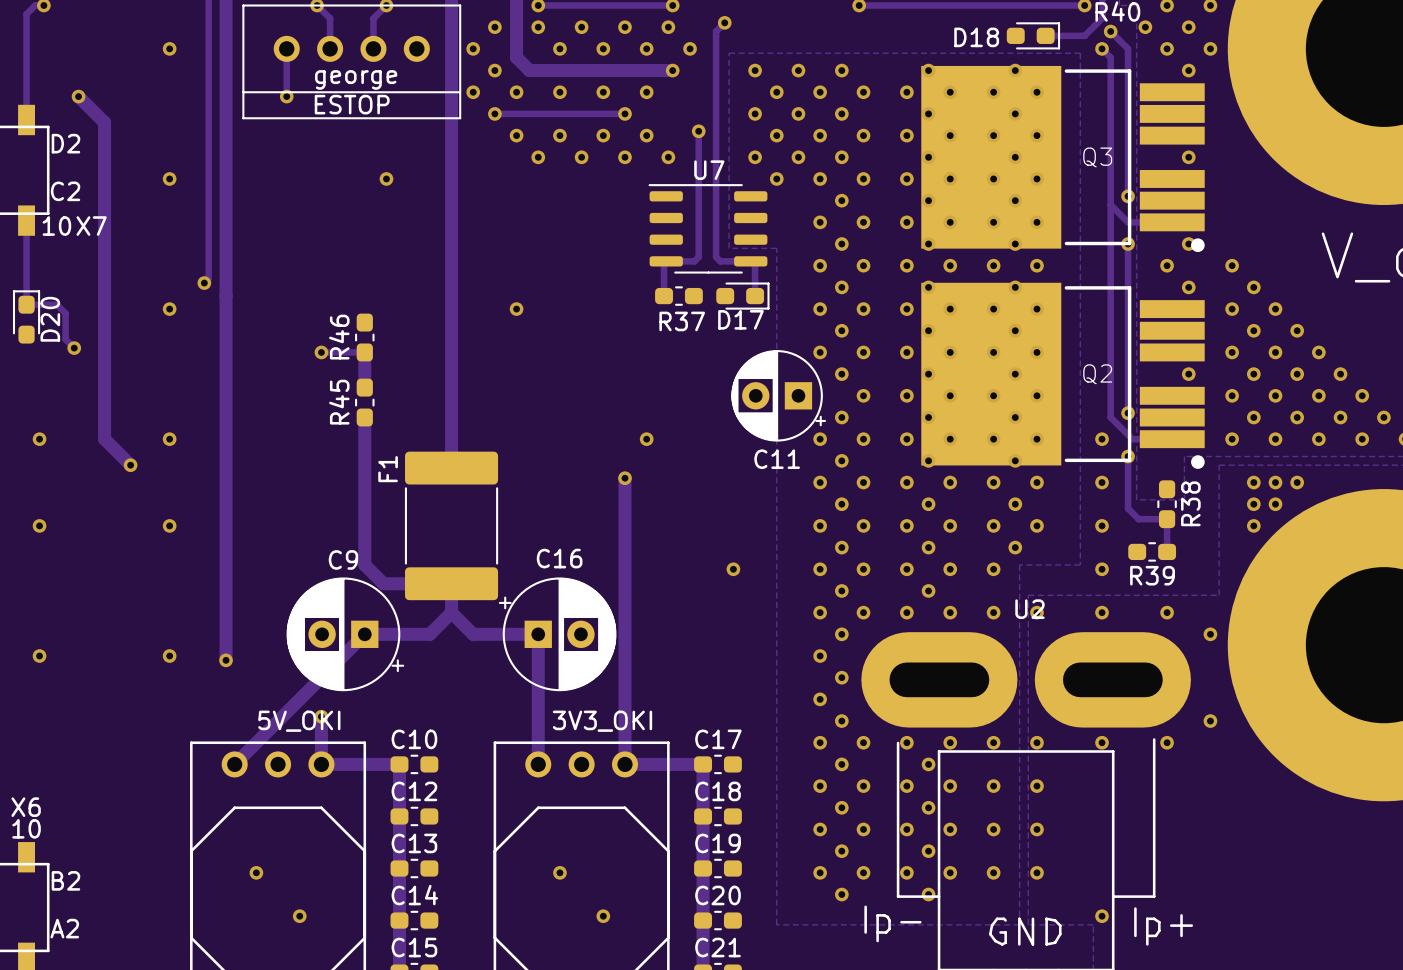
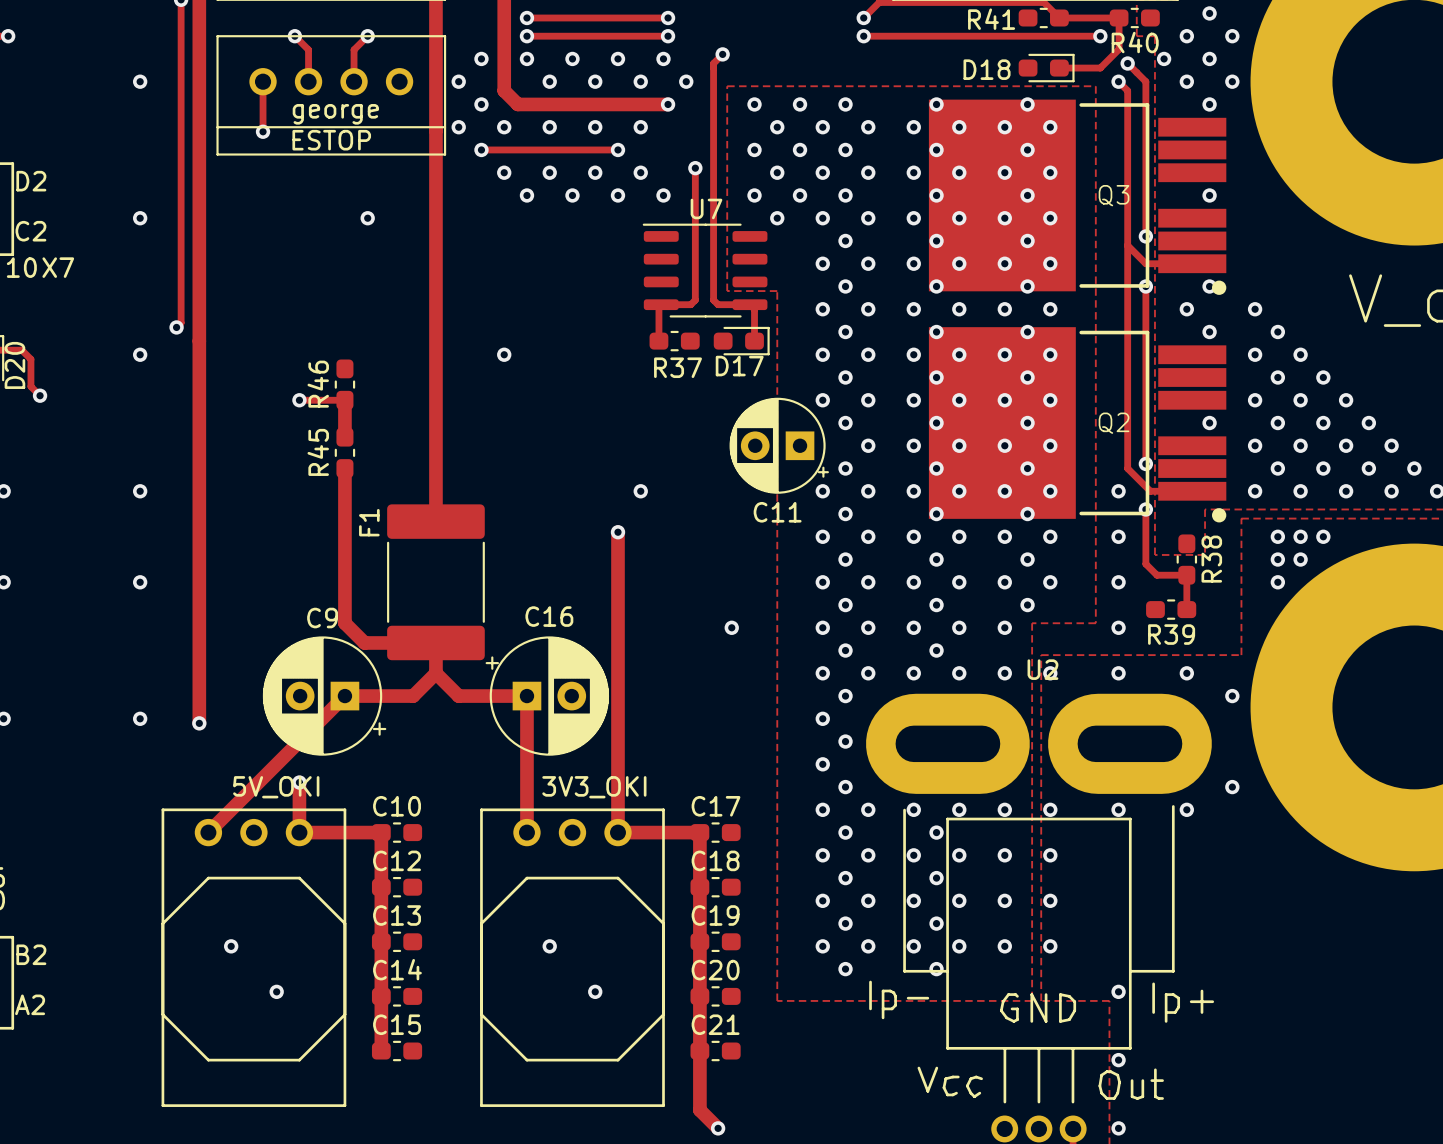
track: (78, 96) (104, 122) (104, 439) (130, 465) -> none
via: (78, 96) -> none
via: (130, 465) -> none

